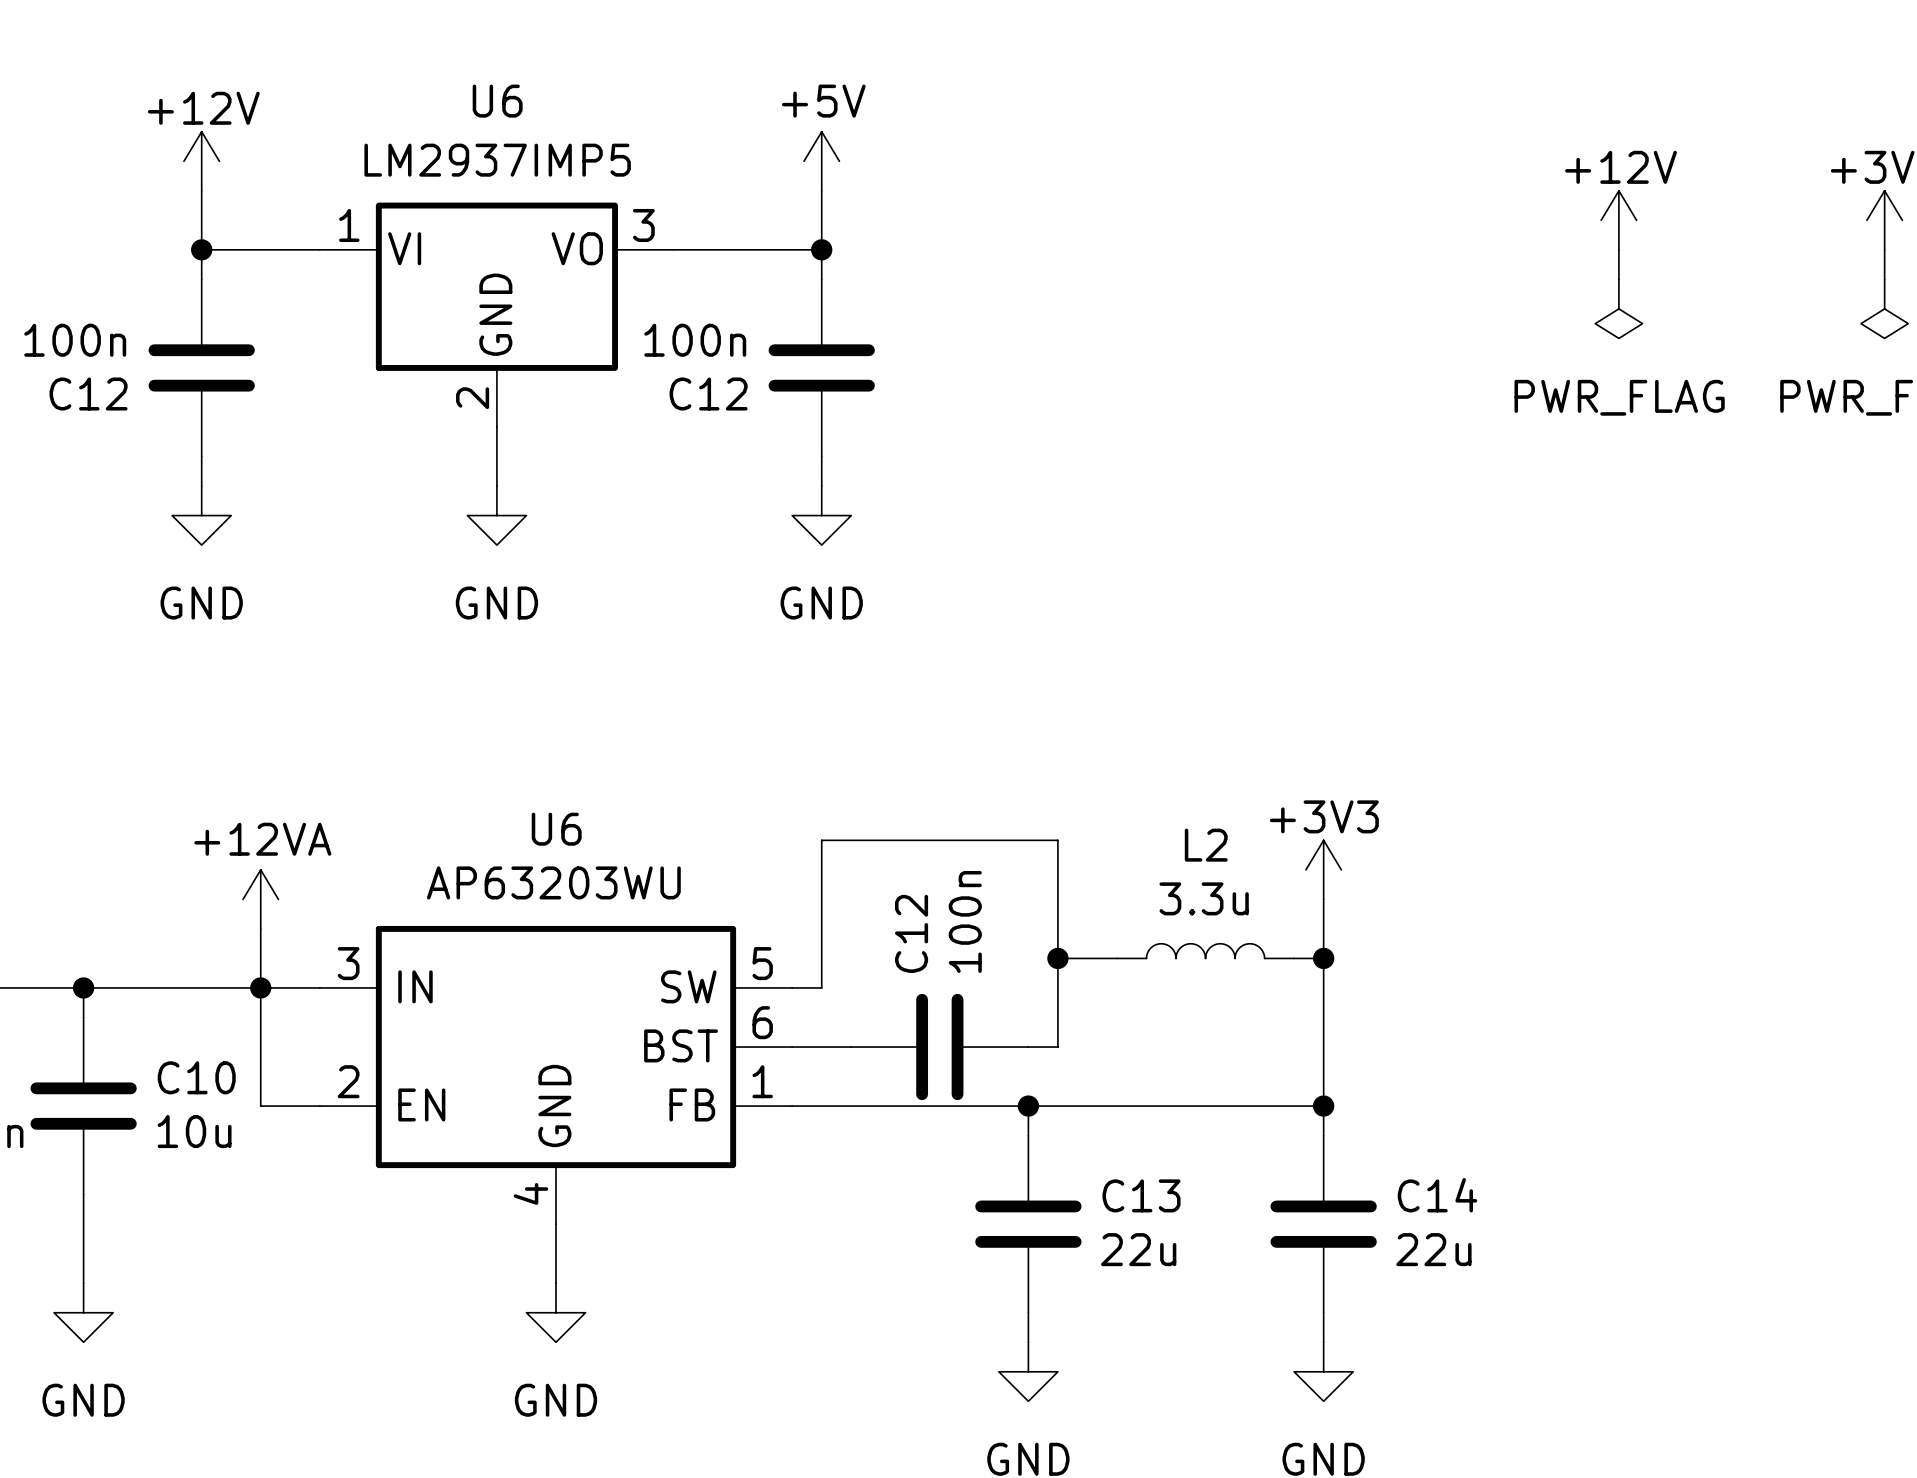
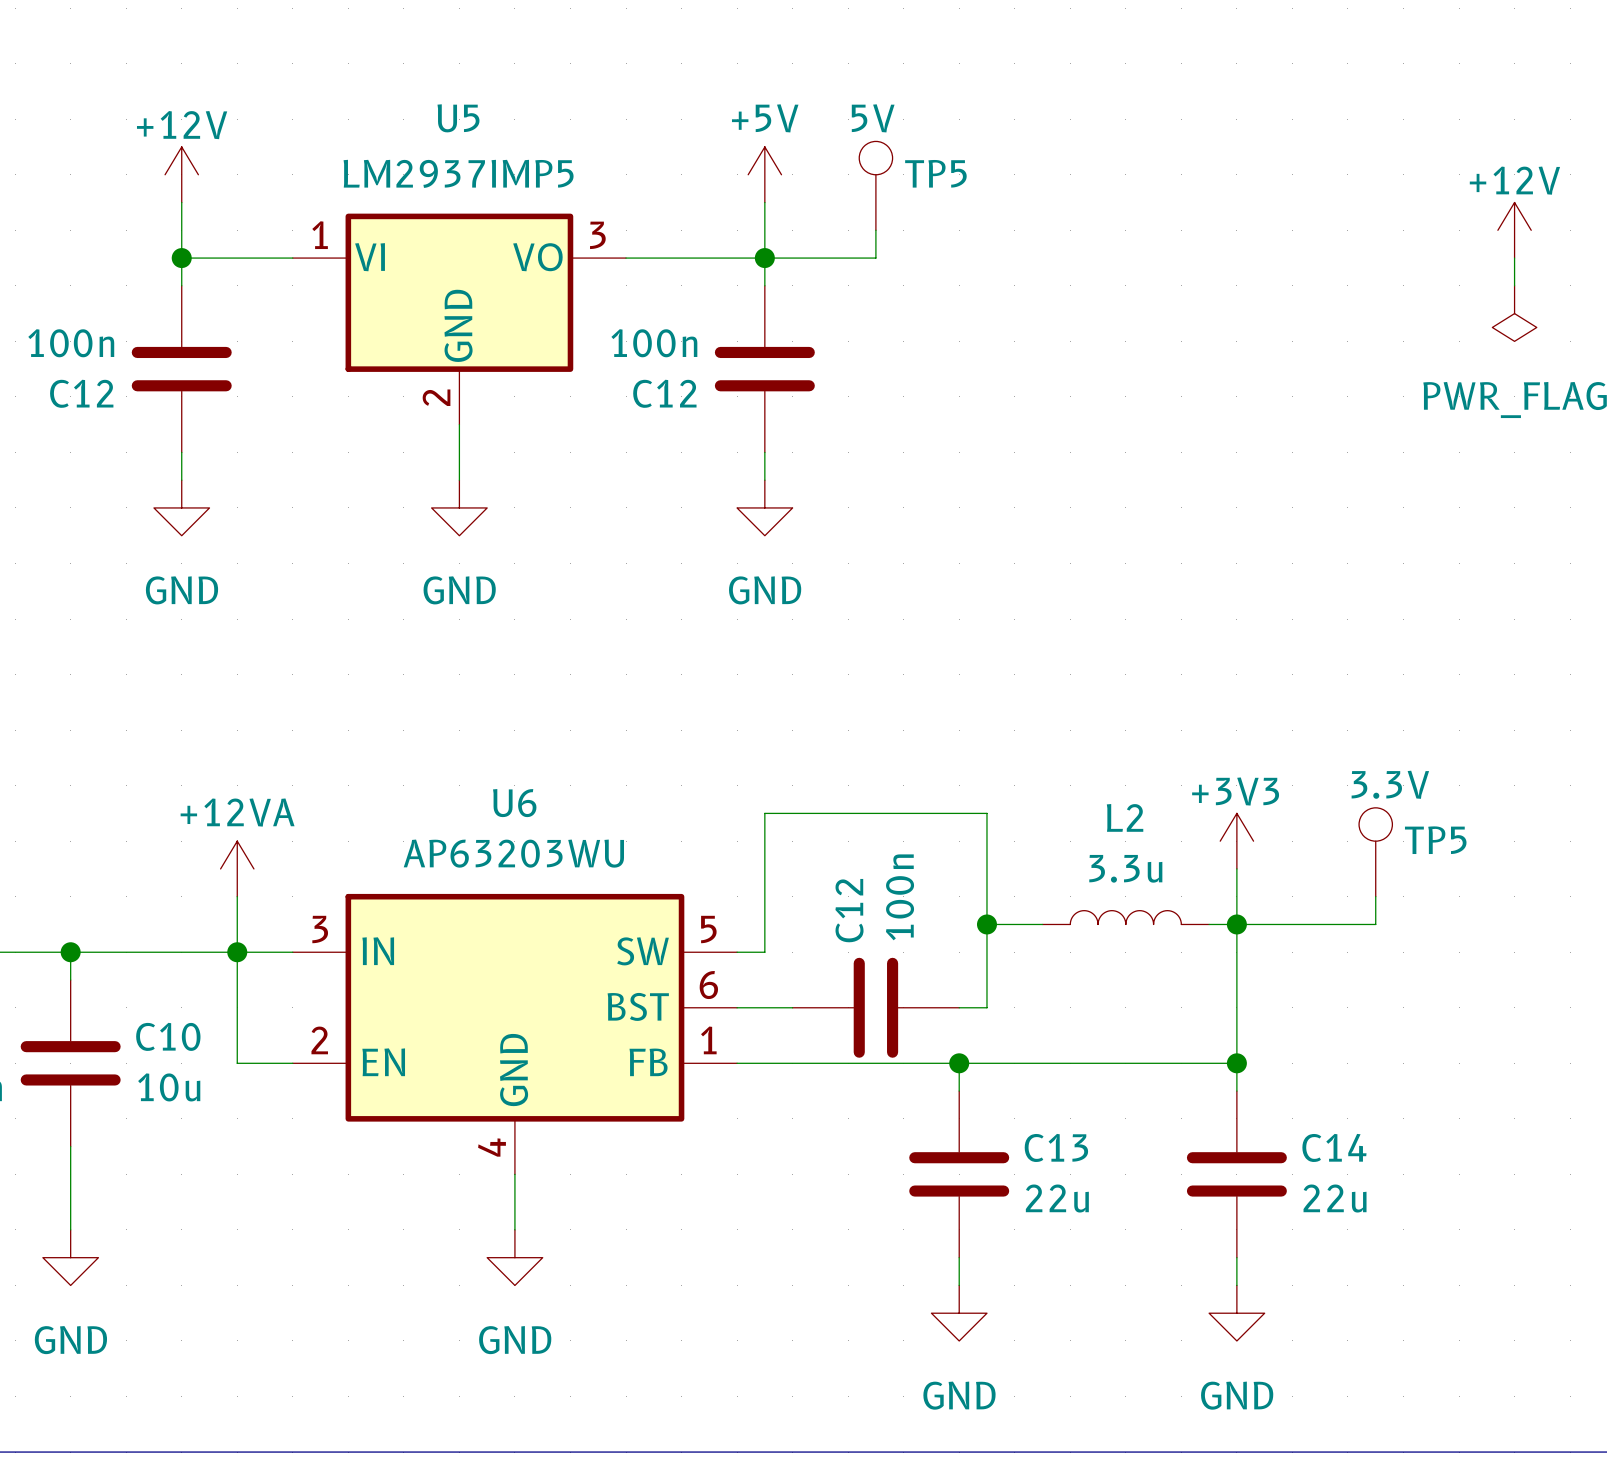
U6 name: U6 (497, 101) -> U5 (458, 118)
TP5: none -> 5V (875, 185)
wire: none -> (875, 230) (875, 258) (764, 258)
TP5: none -> 3.3V (1375, 852)
wire: none -> (1375, 896) (1375, 924) (1236, 924)

